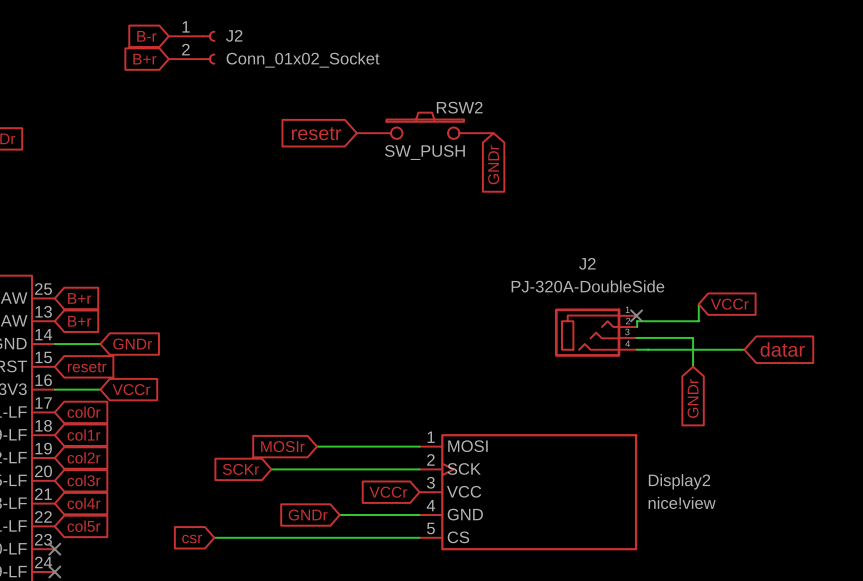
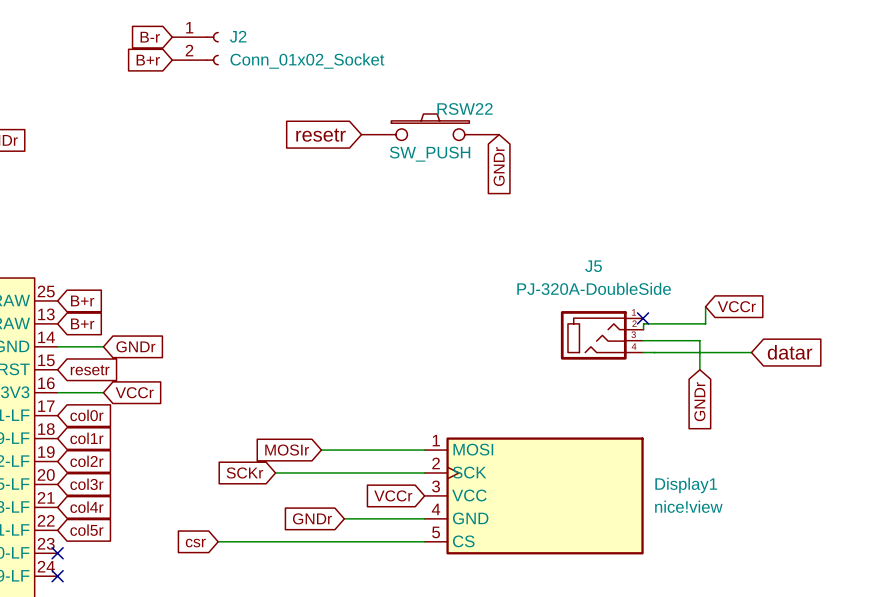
RSW2 name: RSW2 (459, 107) -> RSW22 (465, 108)
J2 name: J2 (587, 263) -> J5 (593, 266)
Display2 name: Display2 (679, 481) -> Display1 (686, 485)

